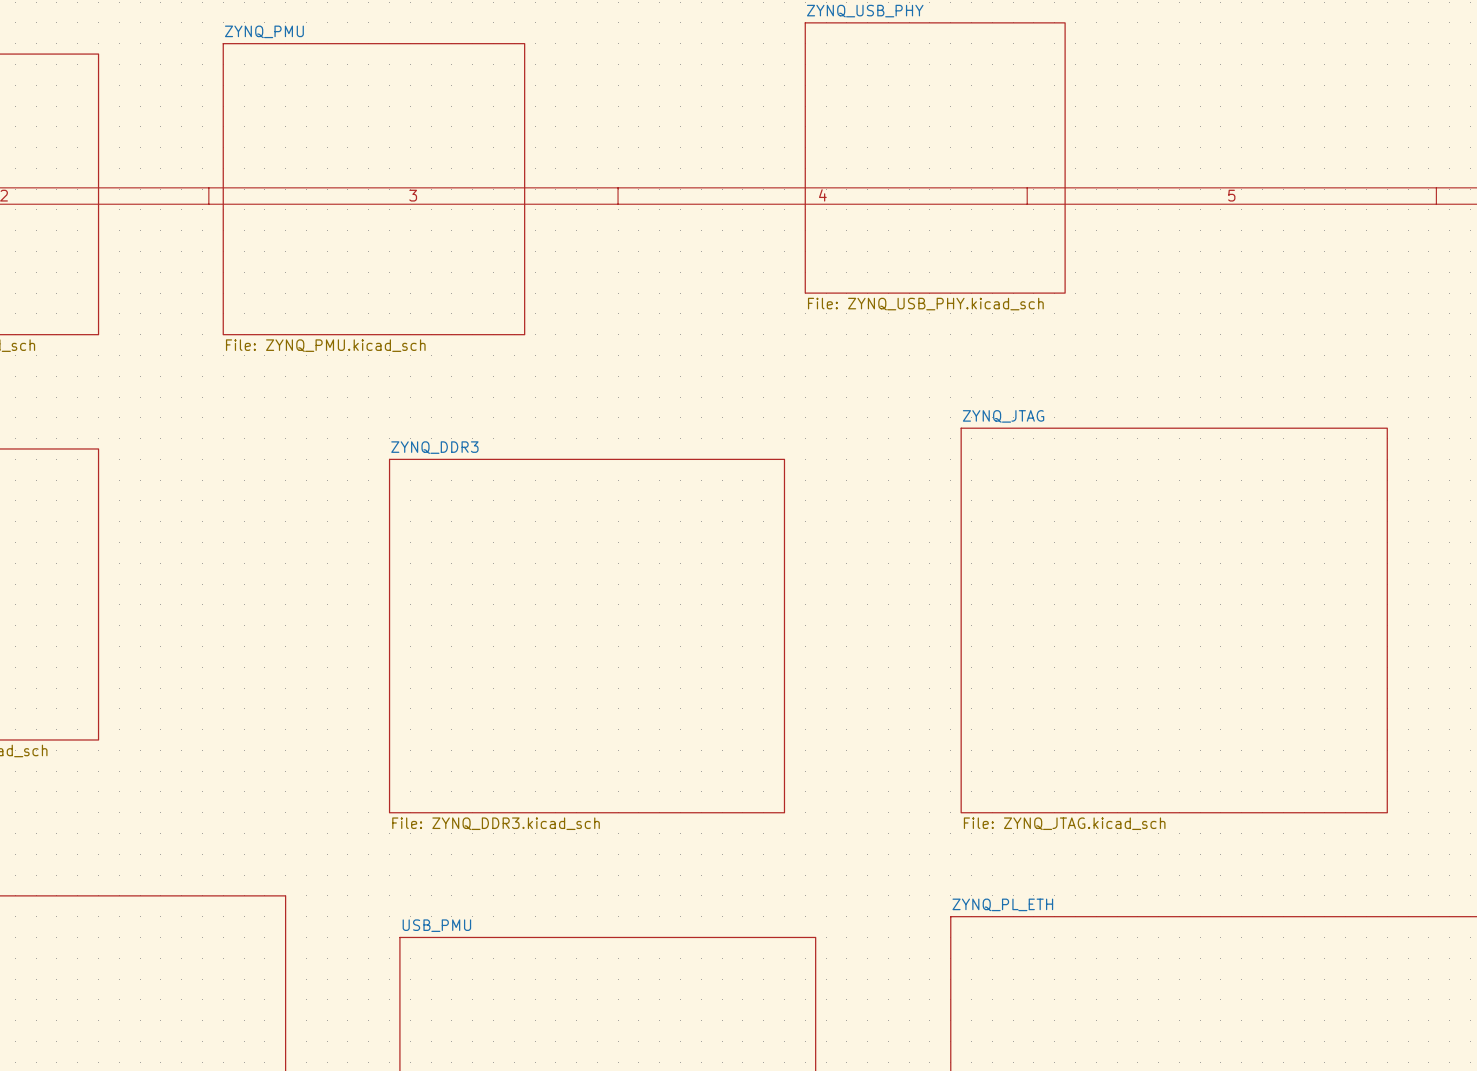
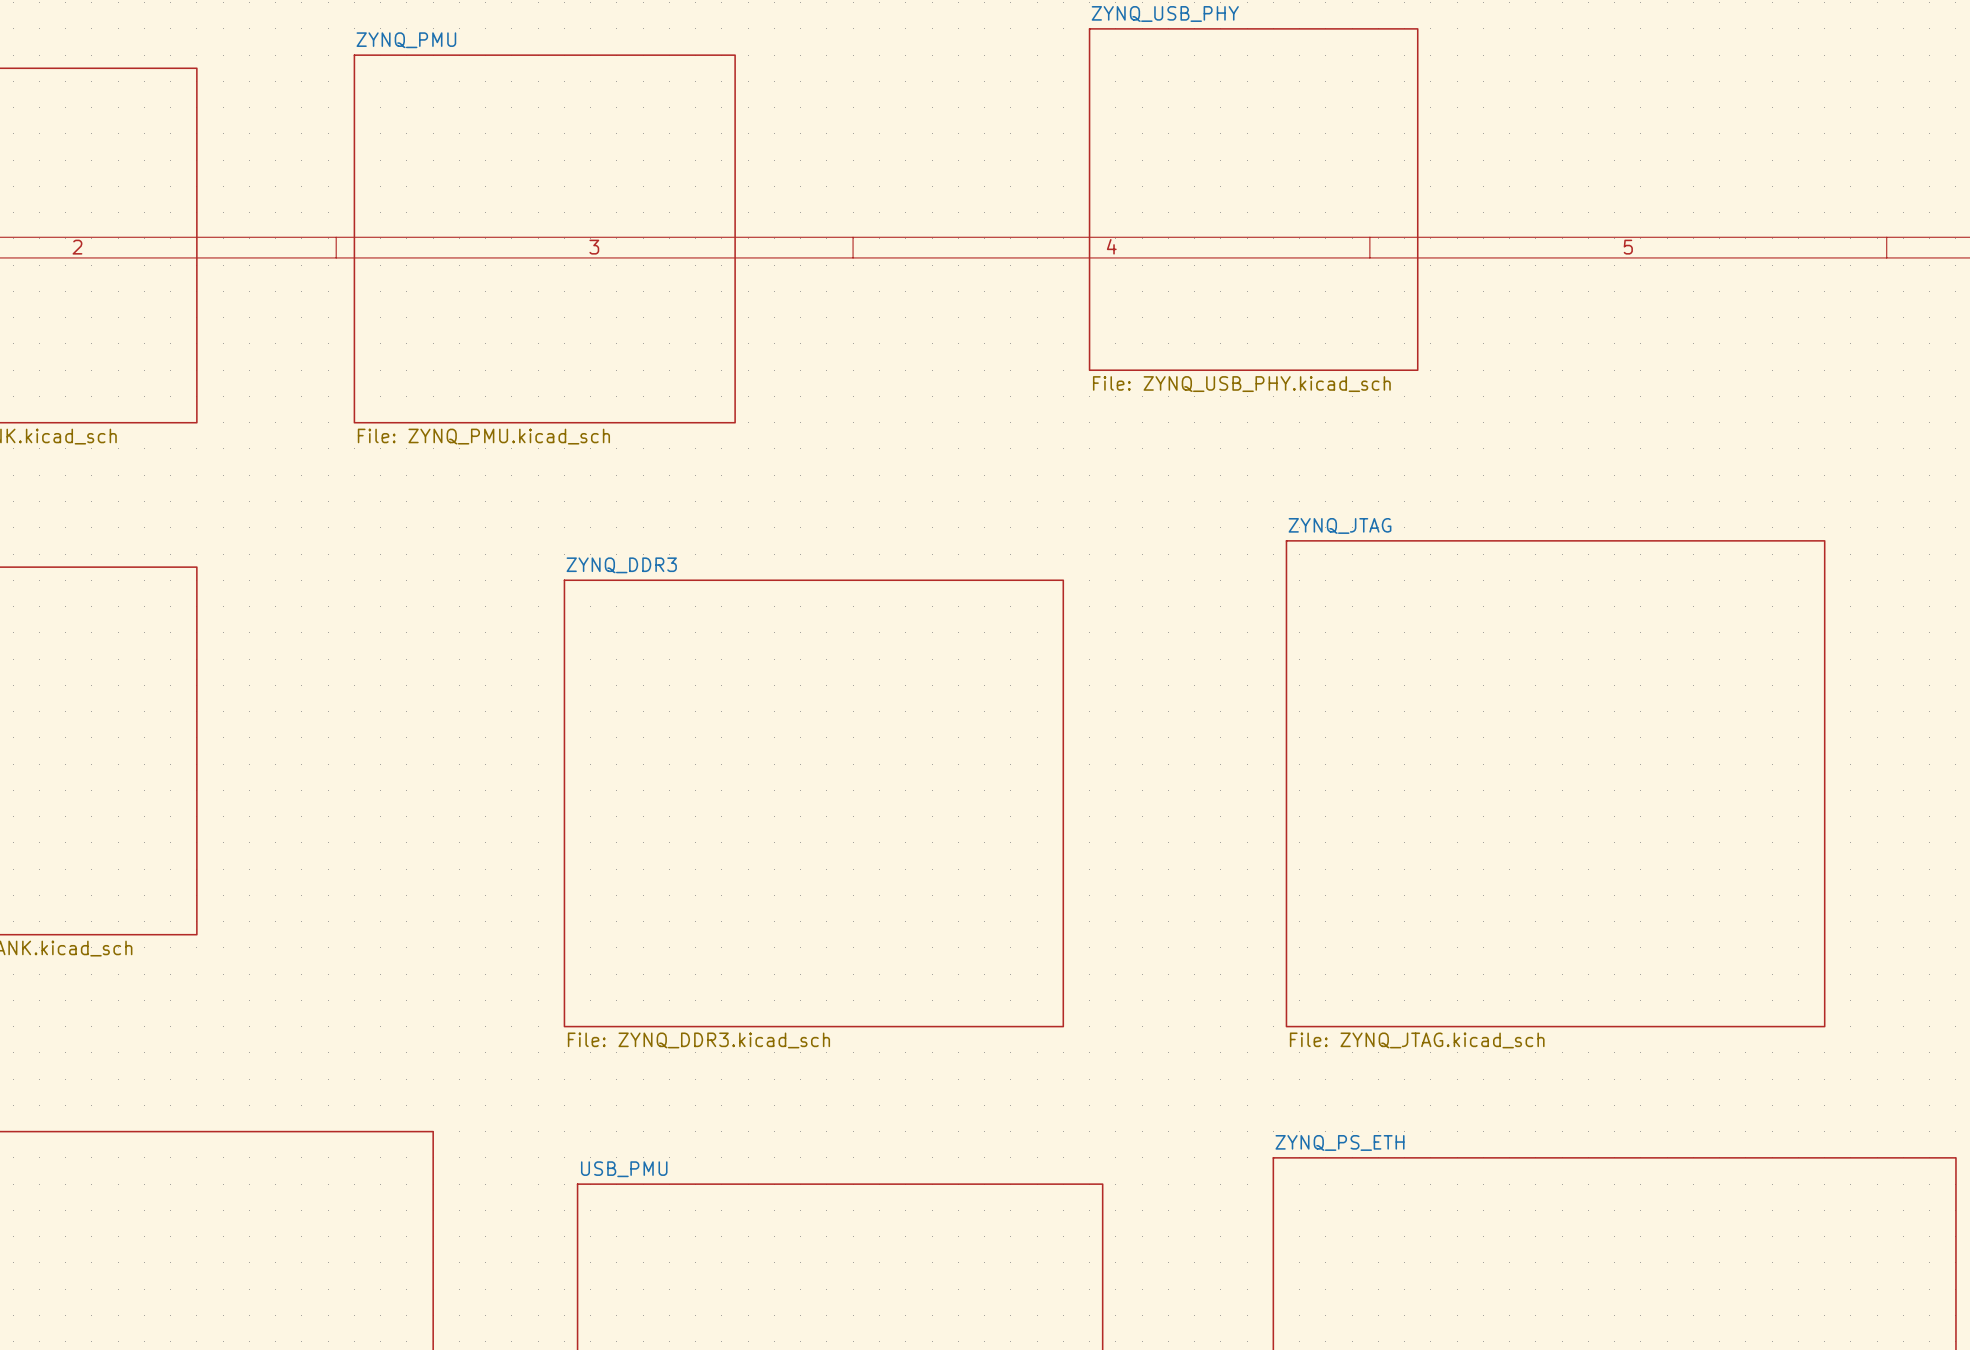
sheet ZYNQ_PL_ETH name: ZYNQ_PL_ETH (1002, 904) -> ZYNQ_PS_ETH (1340, 1142)

